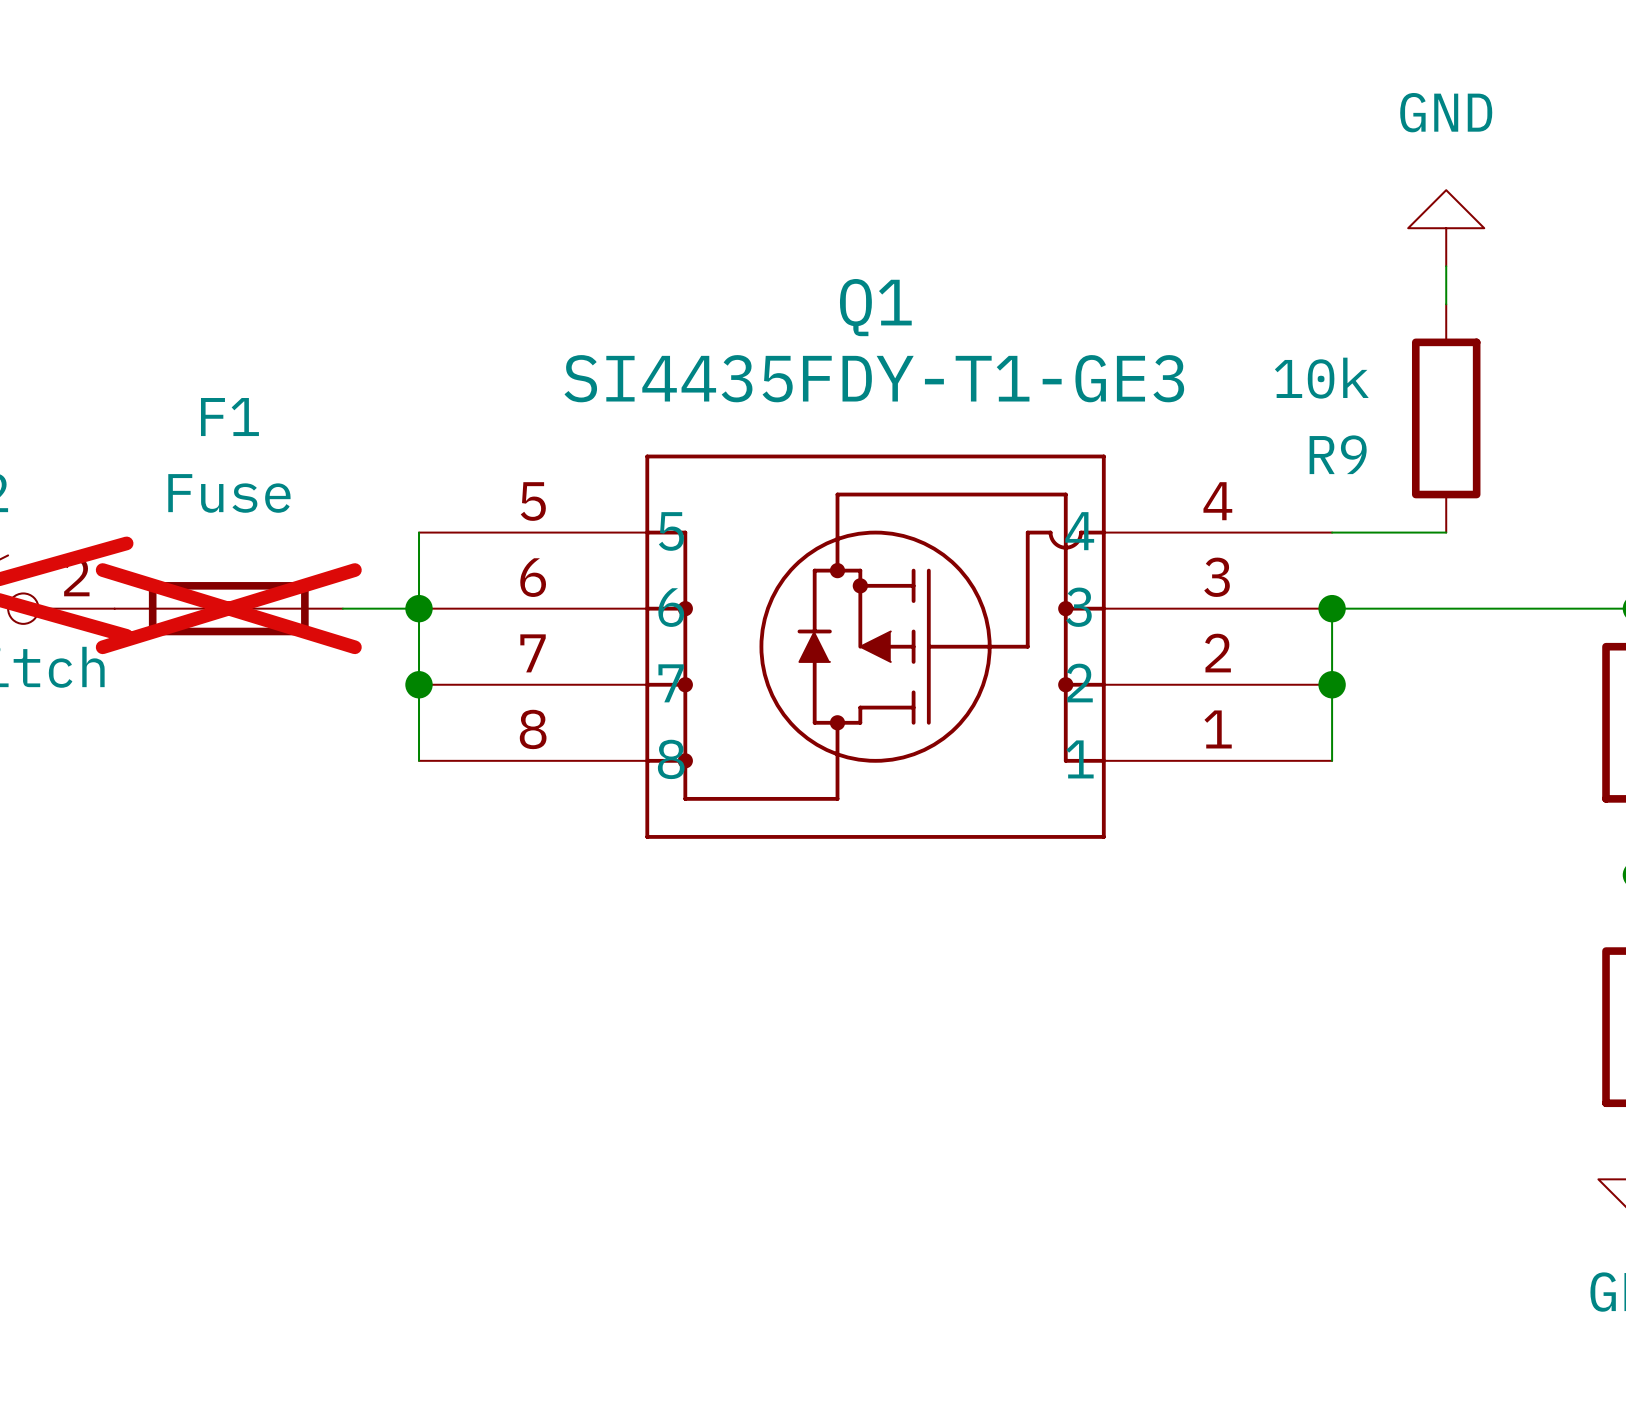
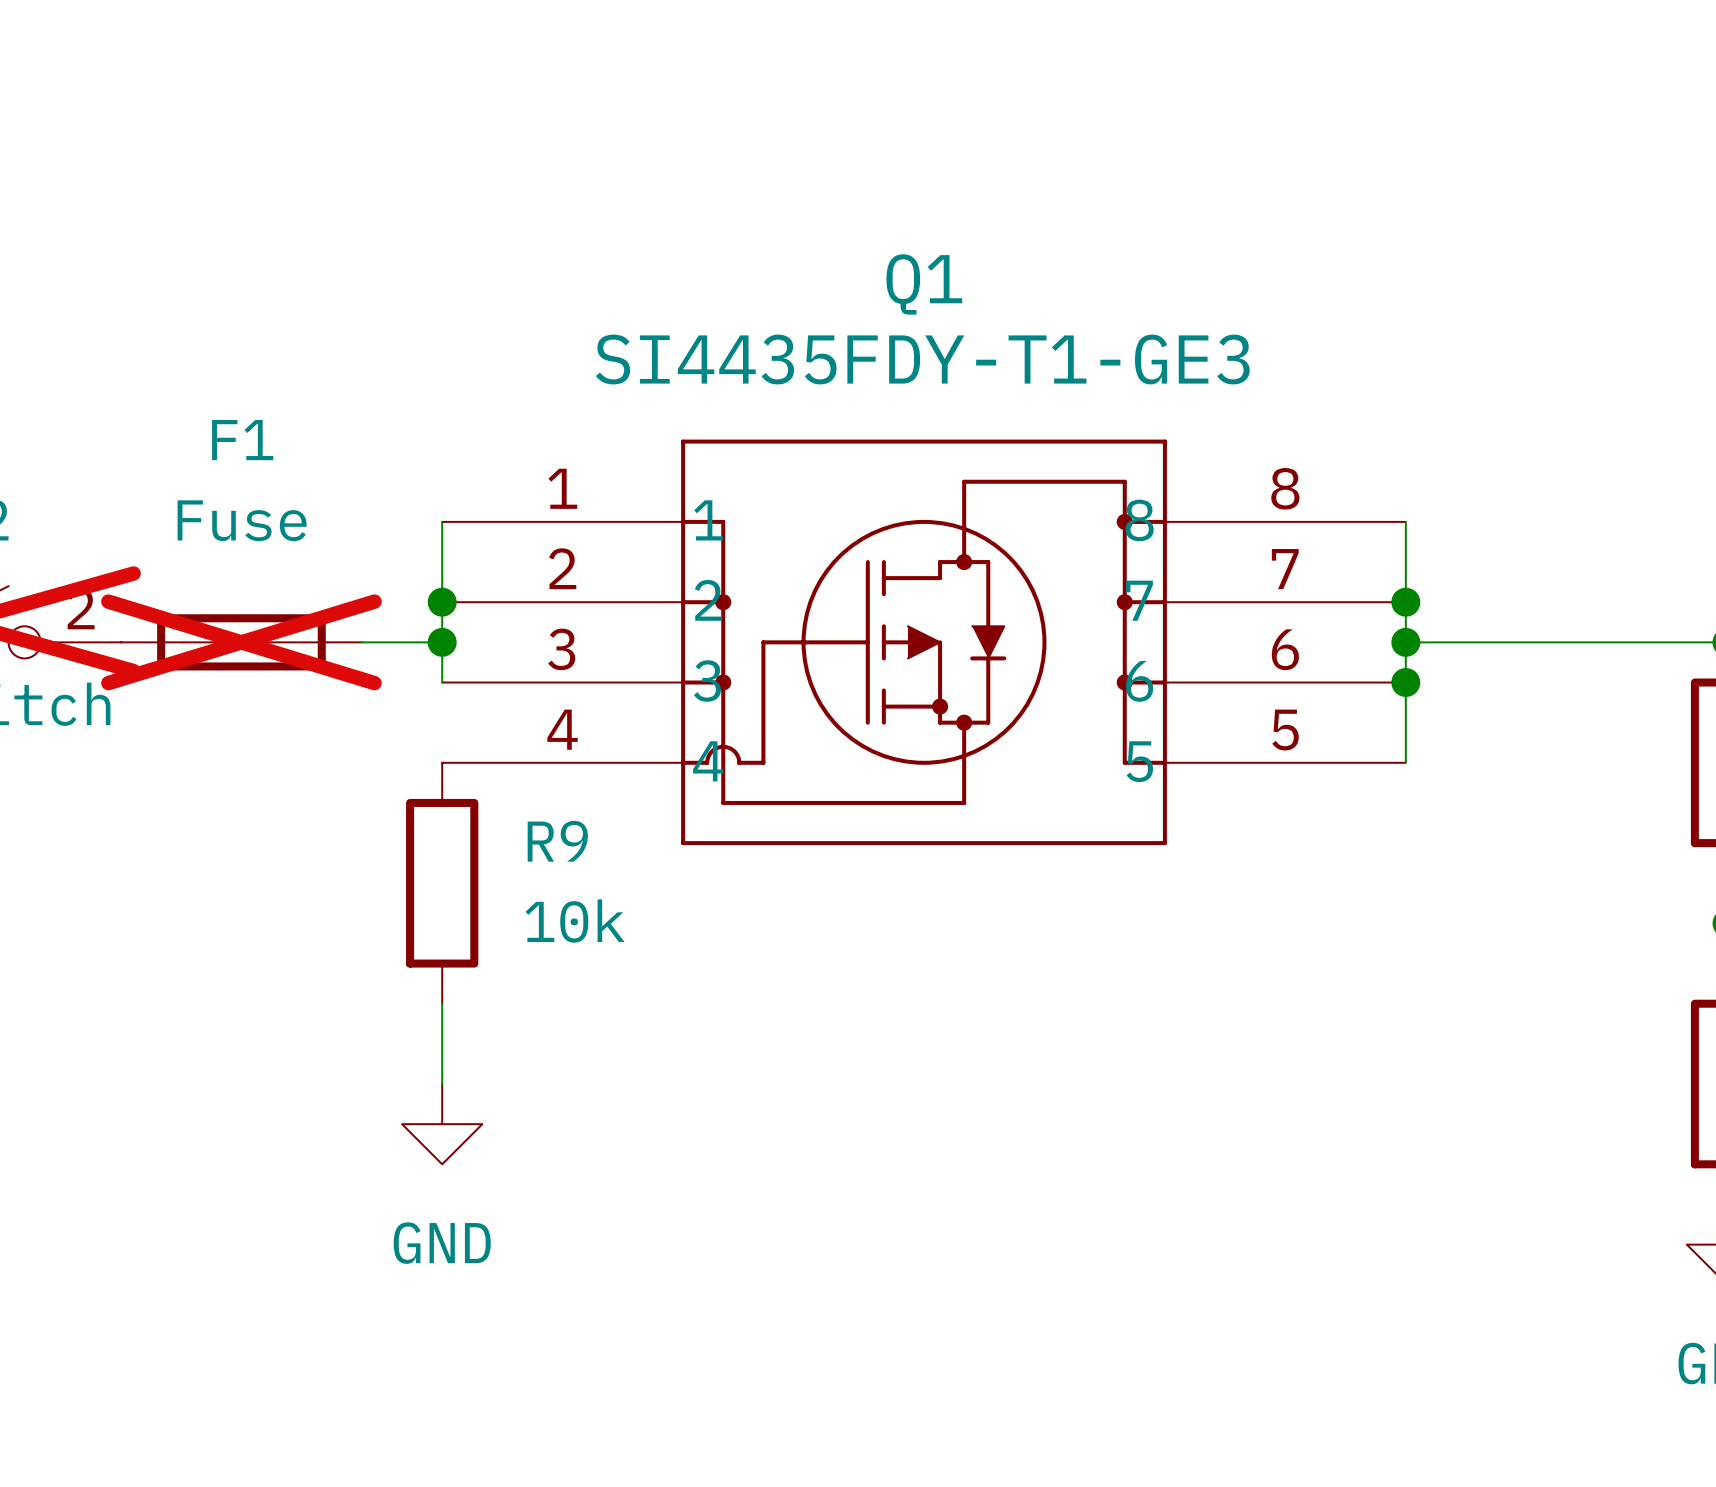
power symbol: GND (1446, 228) -> none
wire: (1446, 266) (1446, 304) -> none
R9 value position: 10k (1321, 378) -> 10k (575, 921)
R9 position: (1446, 418) -> (442, 883)
R9 name position: R9 (1338, 454) -> R9 (557, 841)
wire: none -> (442, 521) (442, 562)
wire: none -> (1405, 521) (1405, 642)
wire: (1332, 532) (1446, 532) -> none
junction: none -> (1405, 602)
wire: (419, 646) (419, 760) -> none
Q1 rotation: 0° (875, 646) -> 180° (924, 642)
junction position: (419, 684) -> (442, 602)
junction position: (1332, 684) -> (1405, 682)
wire: (1332, 722) (1332, 760) -> none
wire: none -> (442, 1003) (442, 1084)
power symbol: none -> GND (442, 1124)

